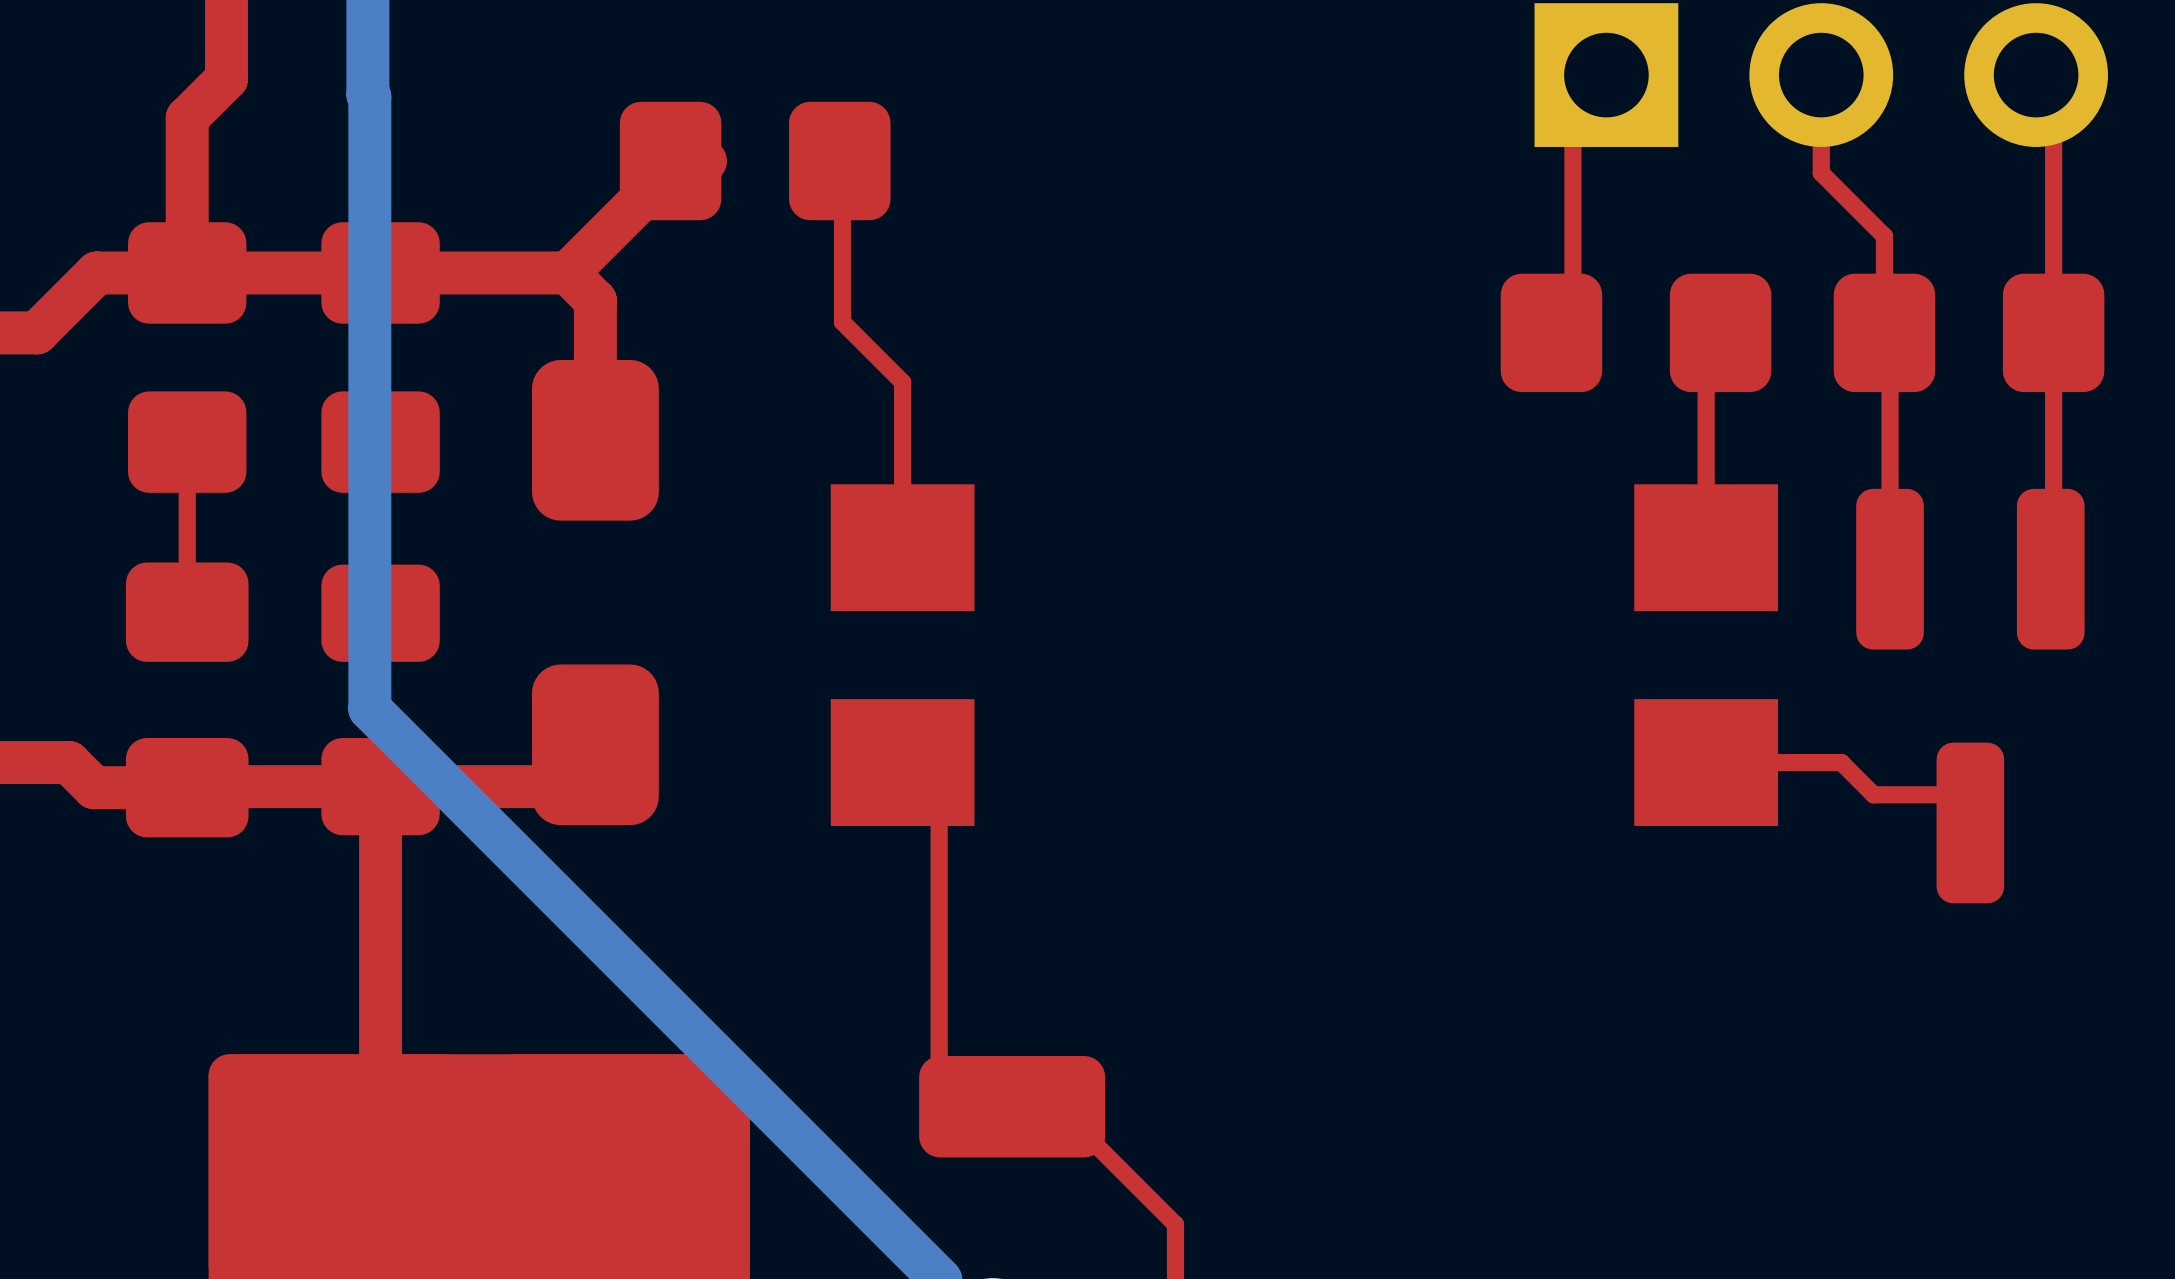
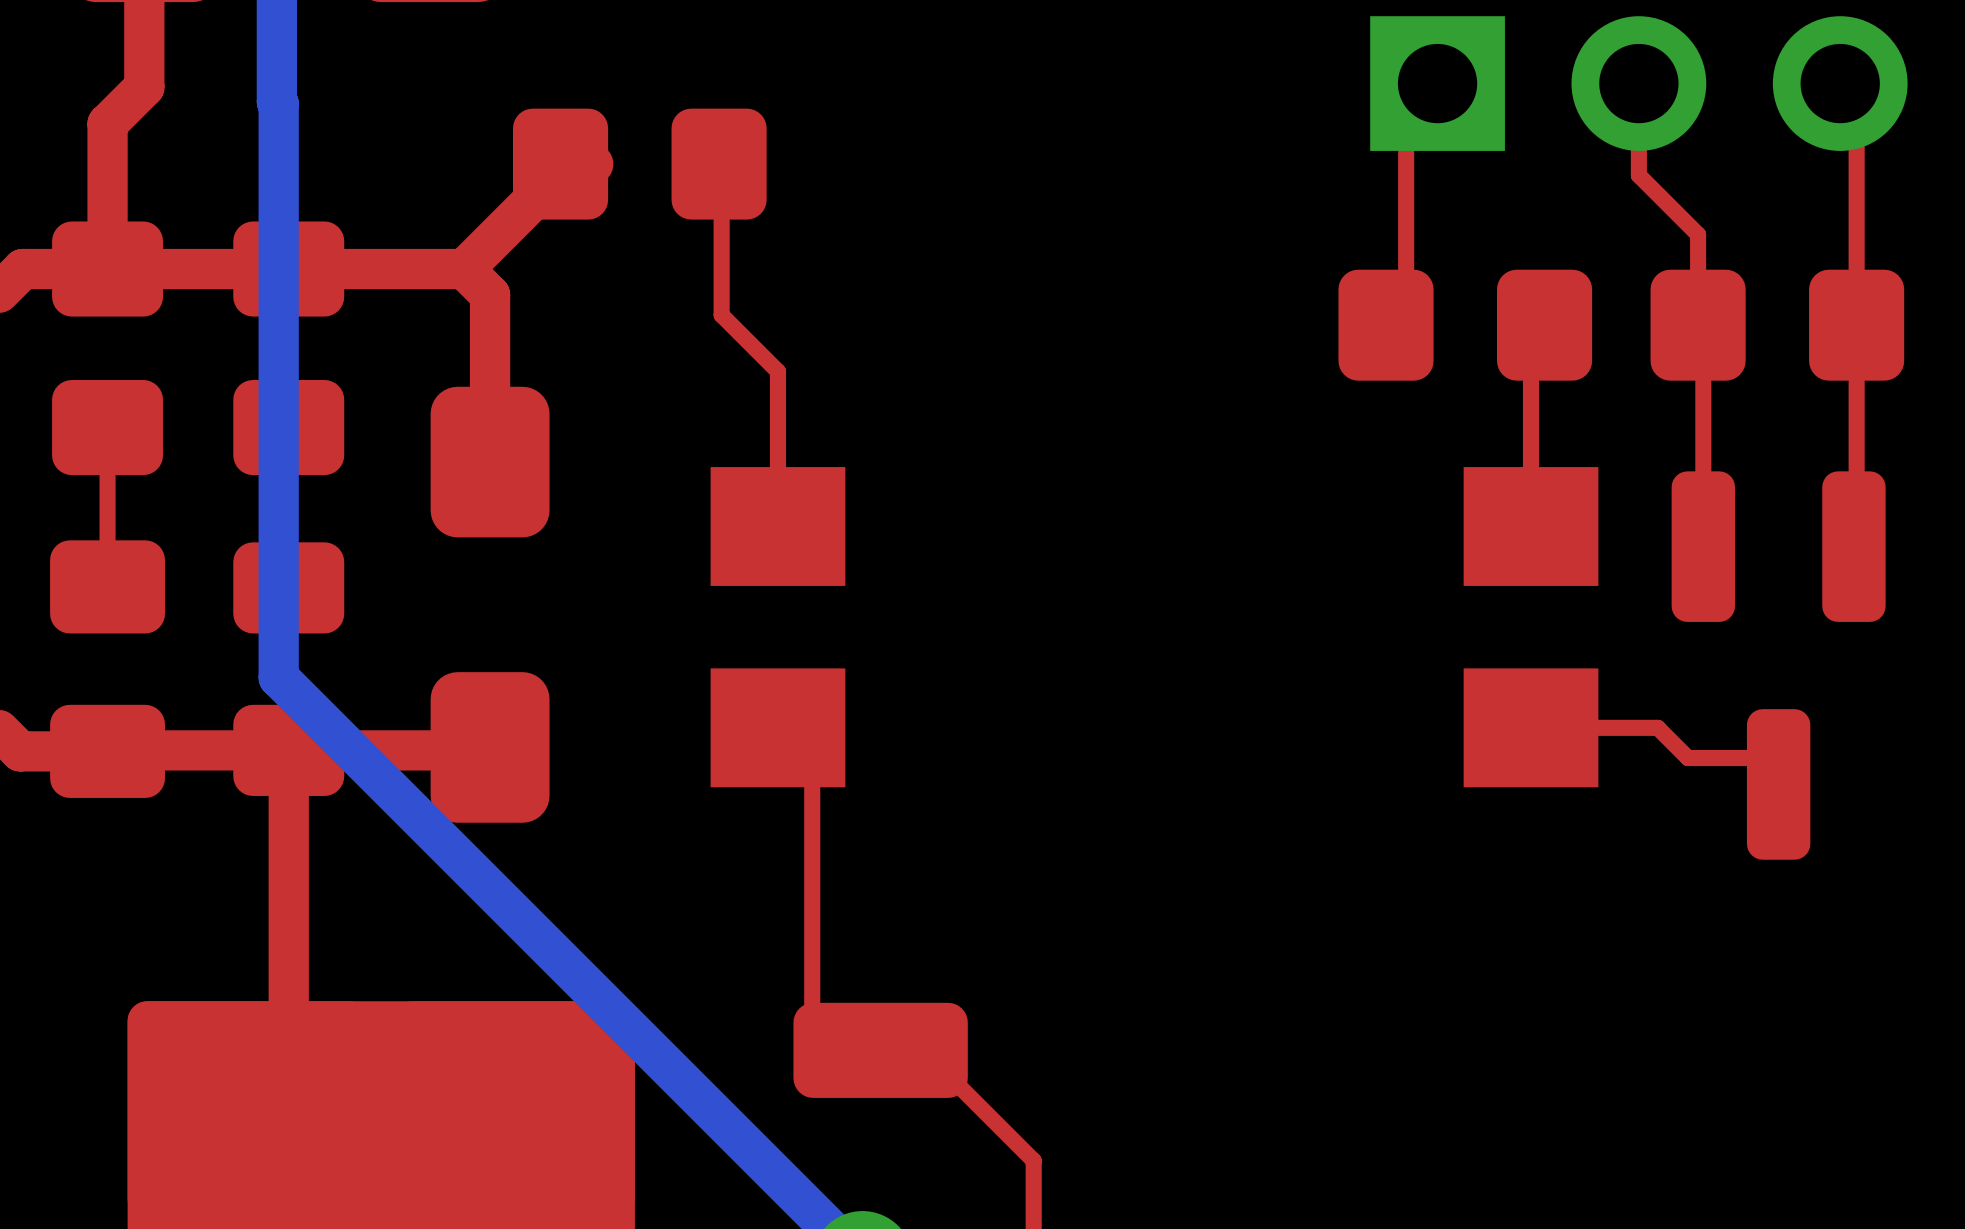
part position: (595, 592) -> (490, 604)

